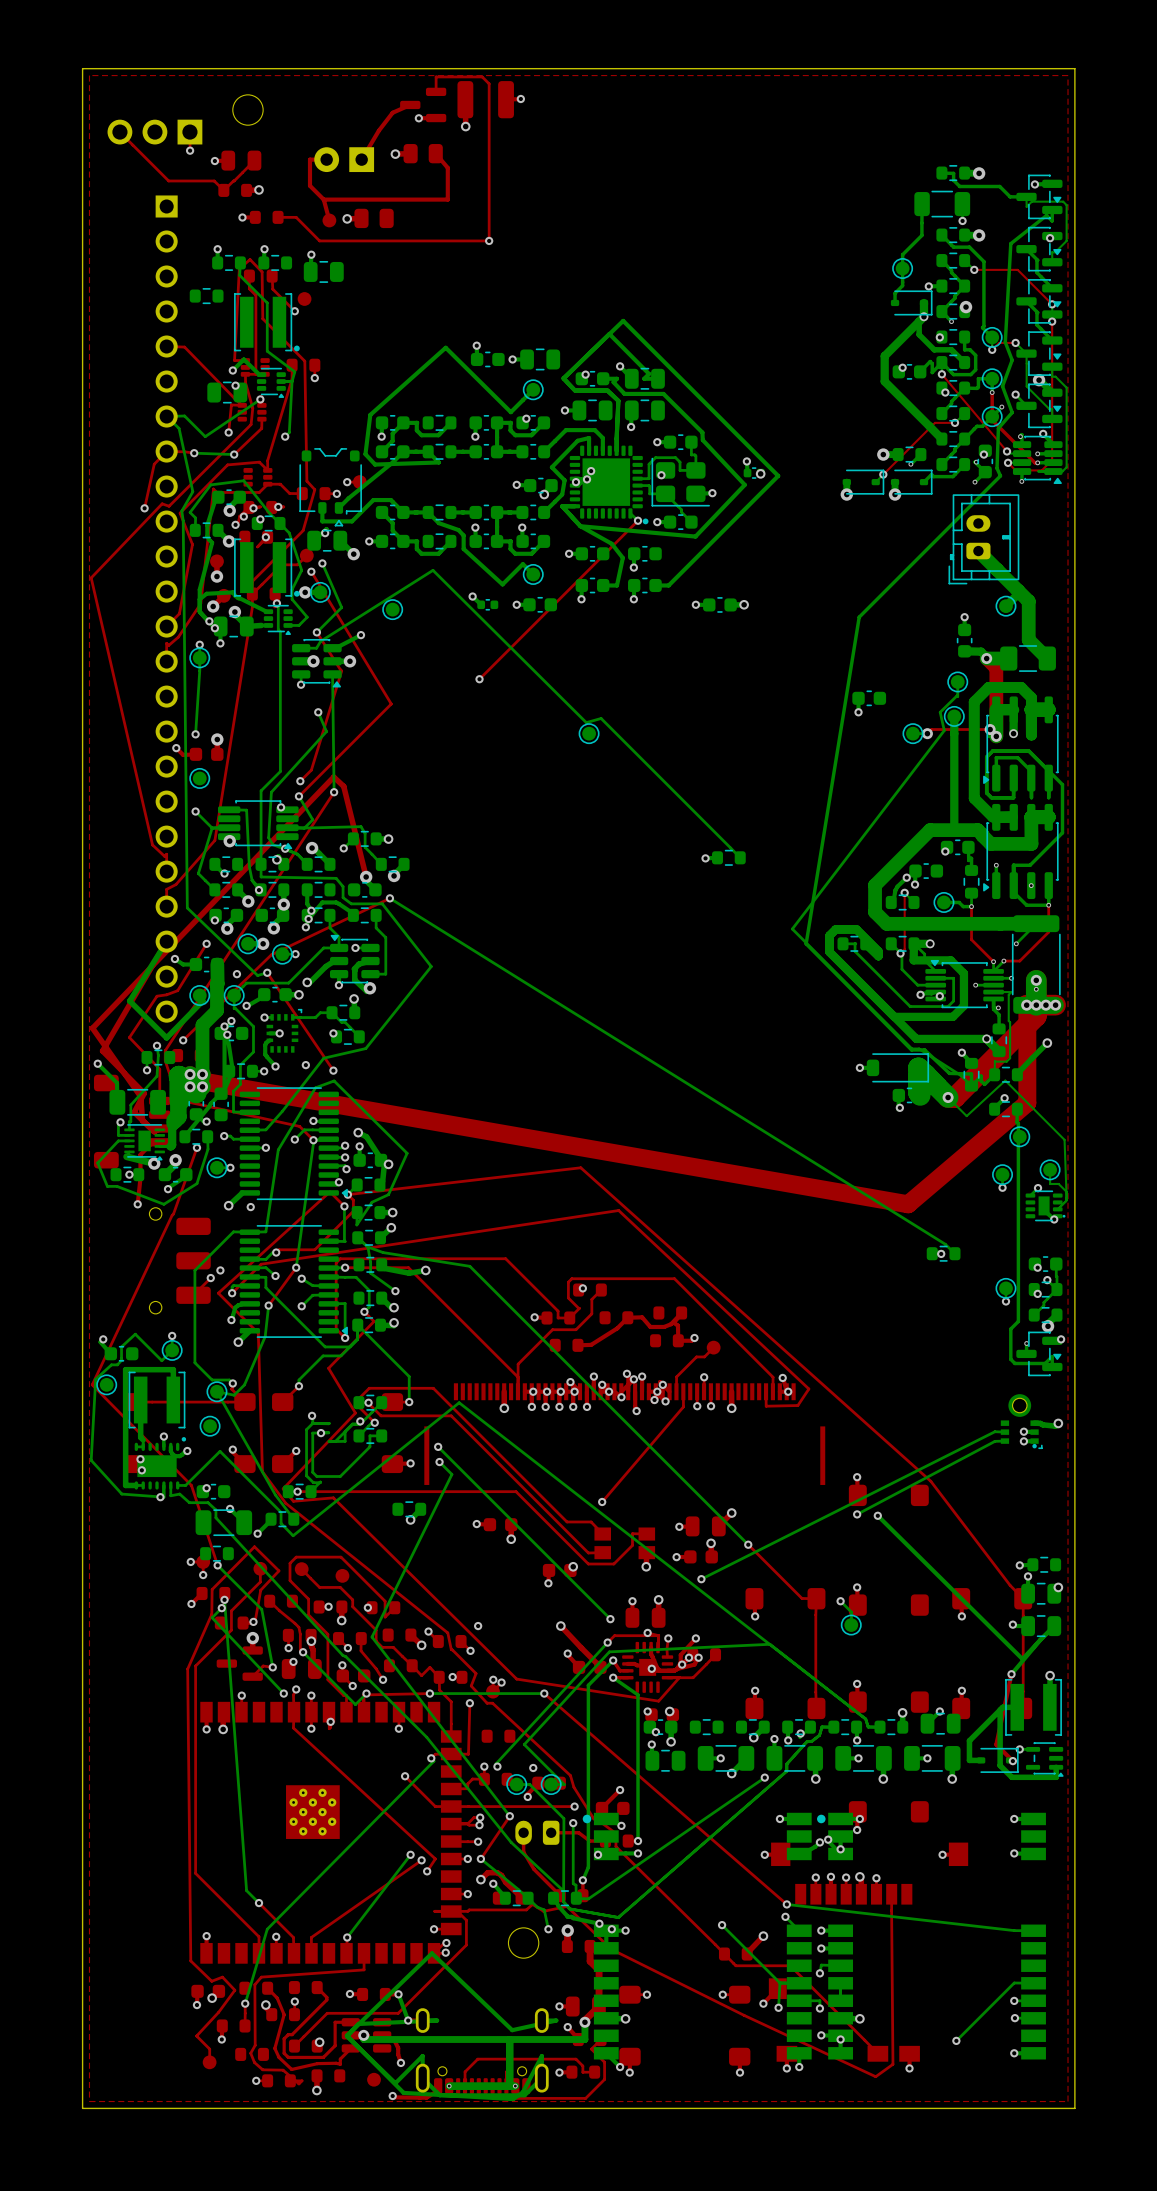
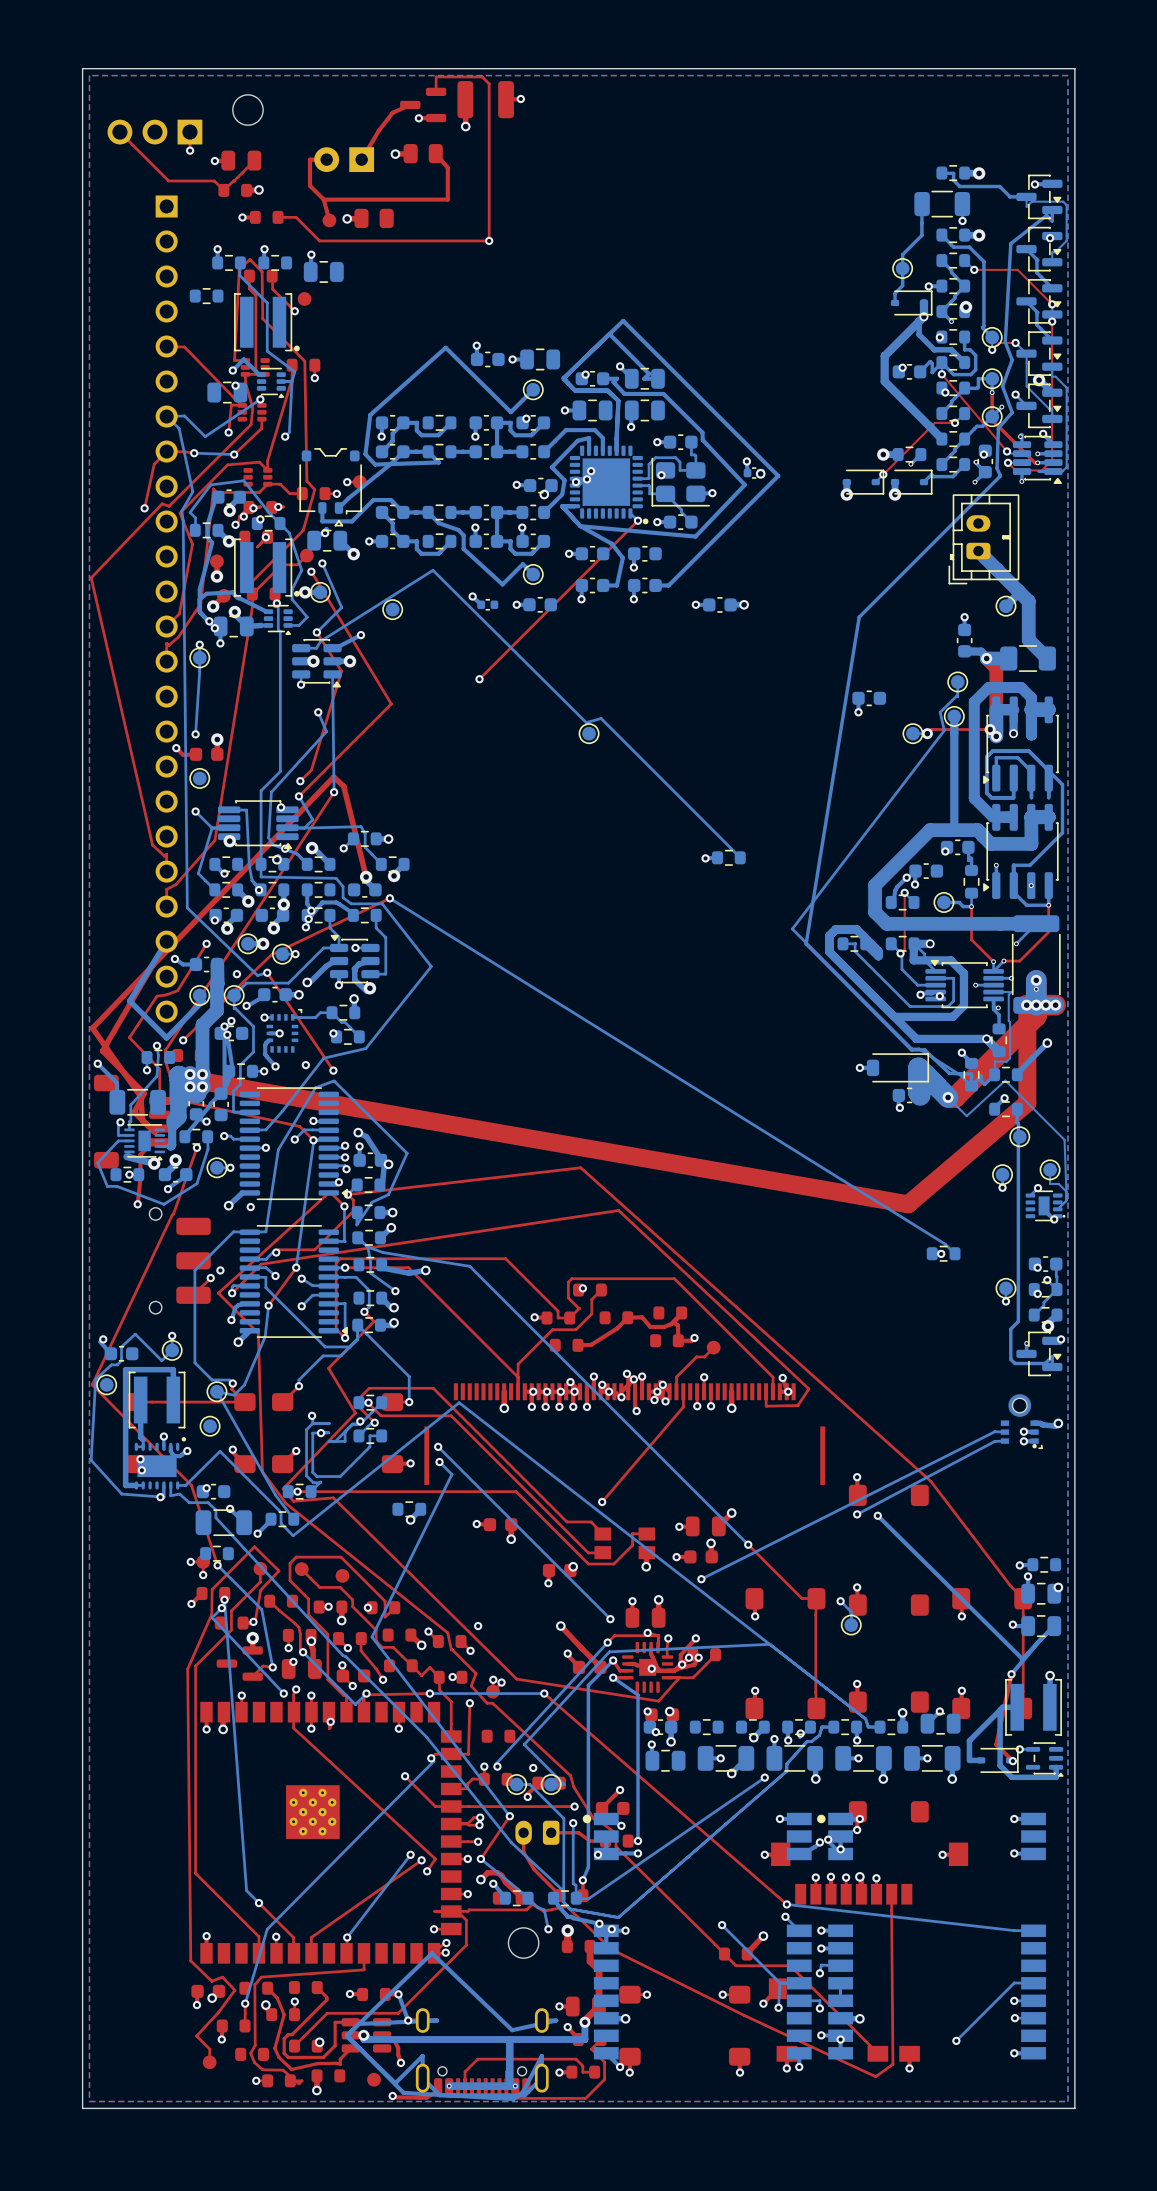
bottom zone outline: none -> (1068, 75) (89, 75) (89, 2101) (1068, 2101) (1068, 75)

